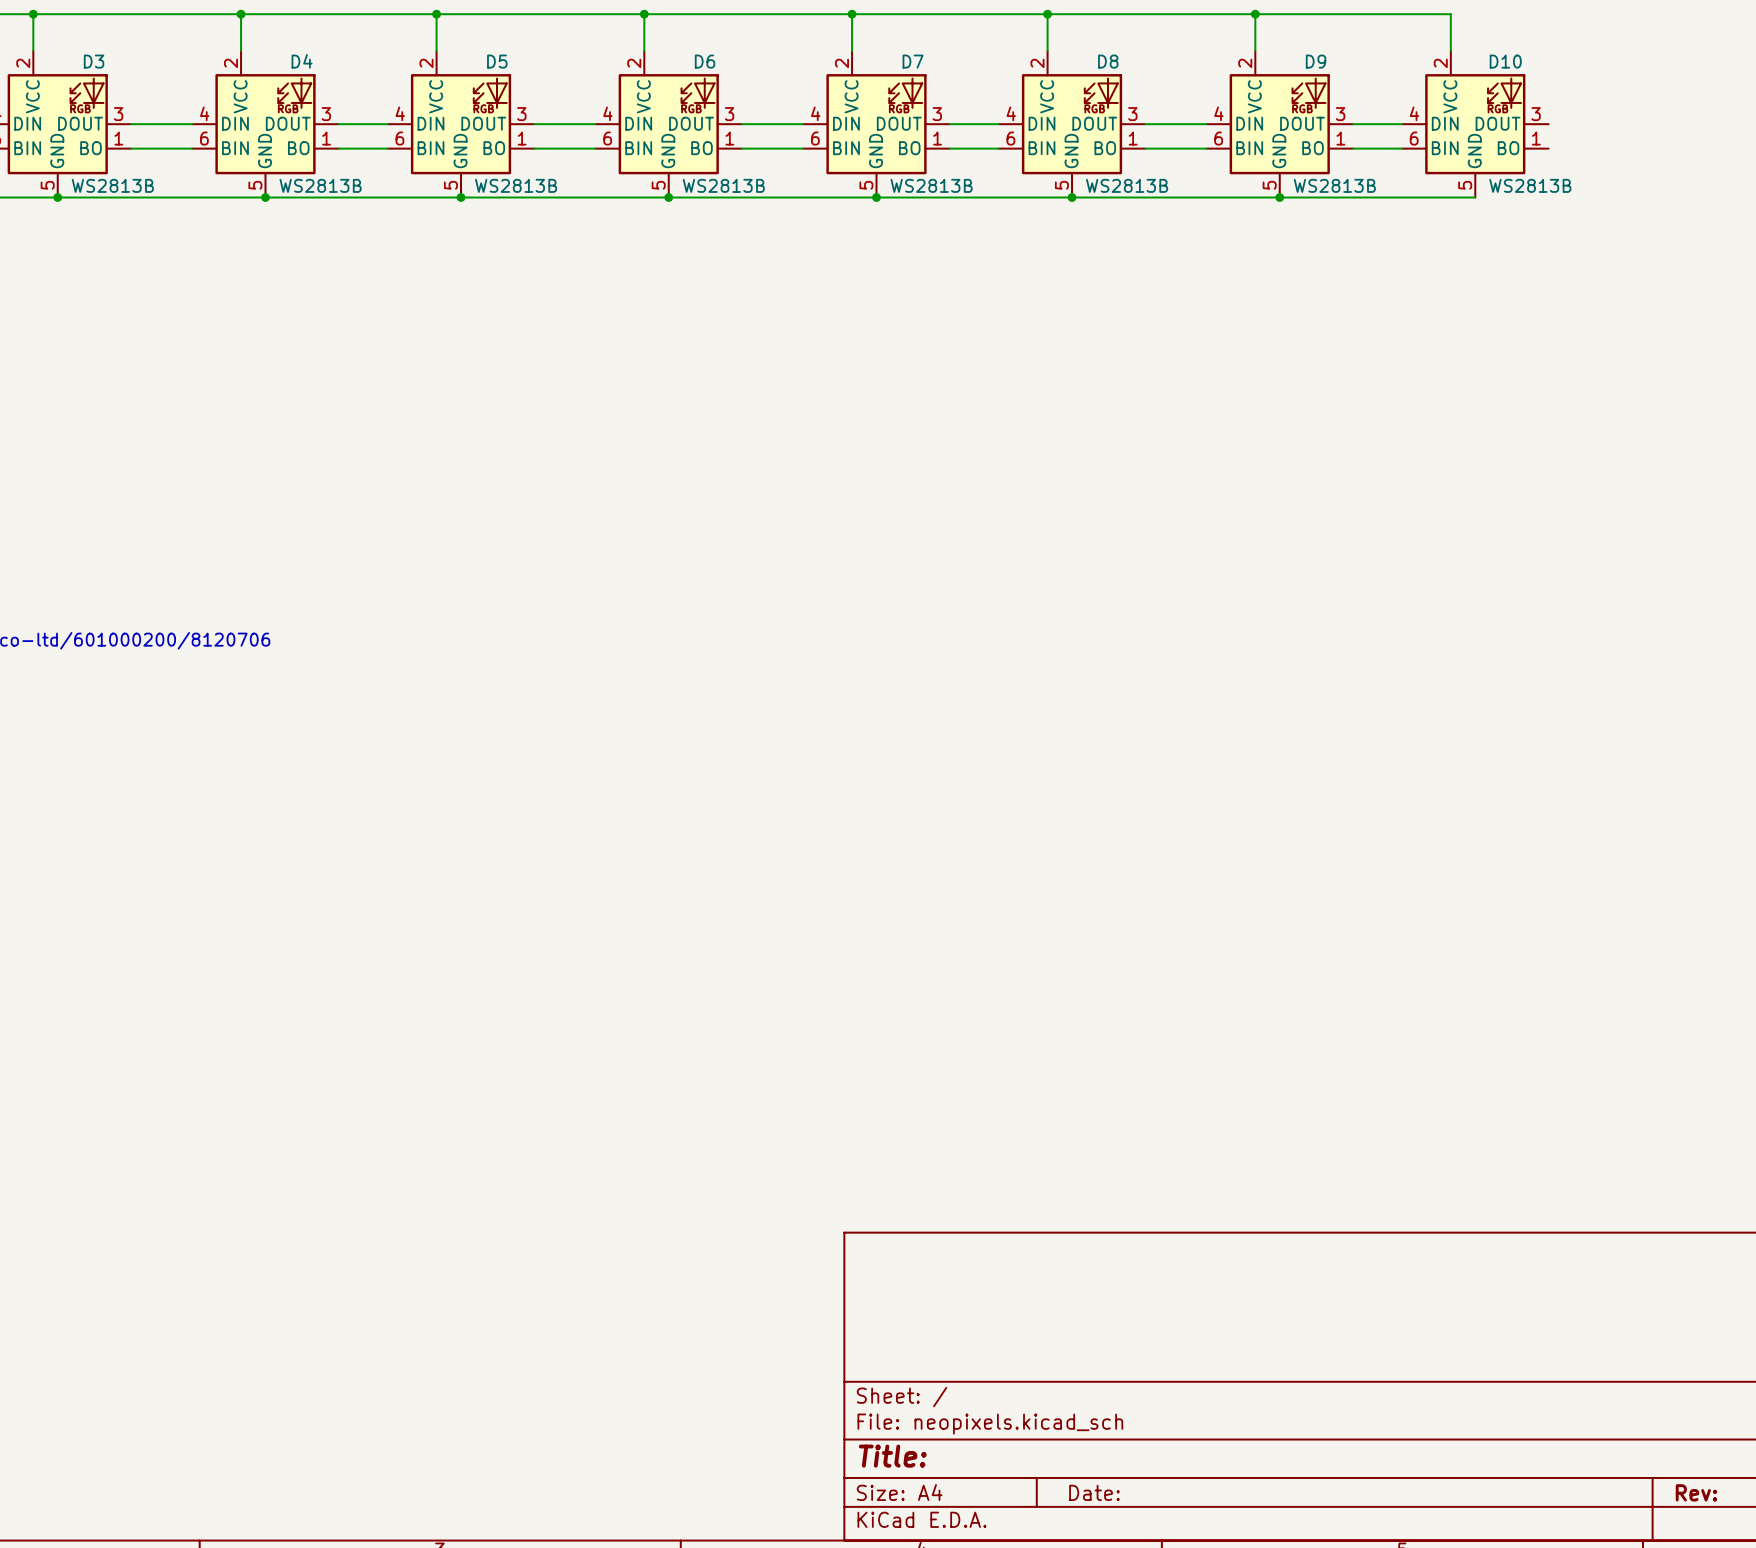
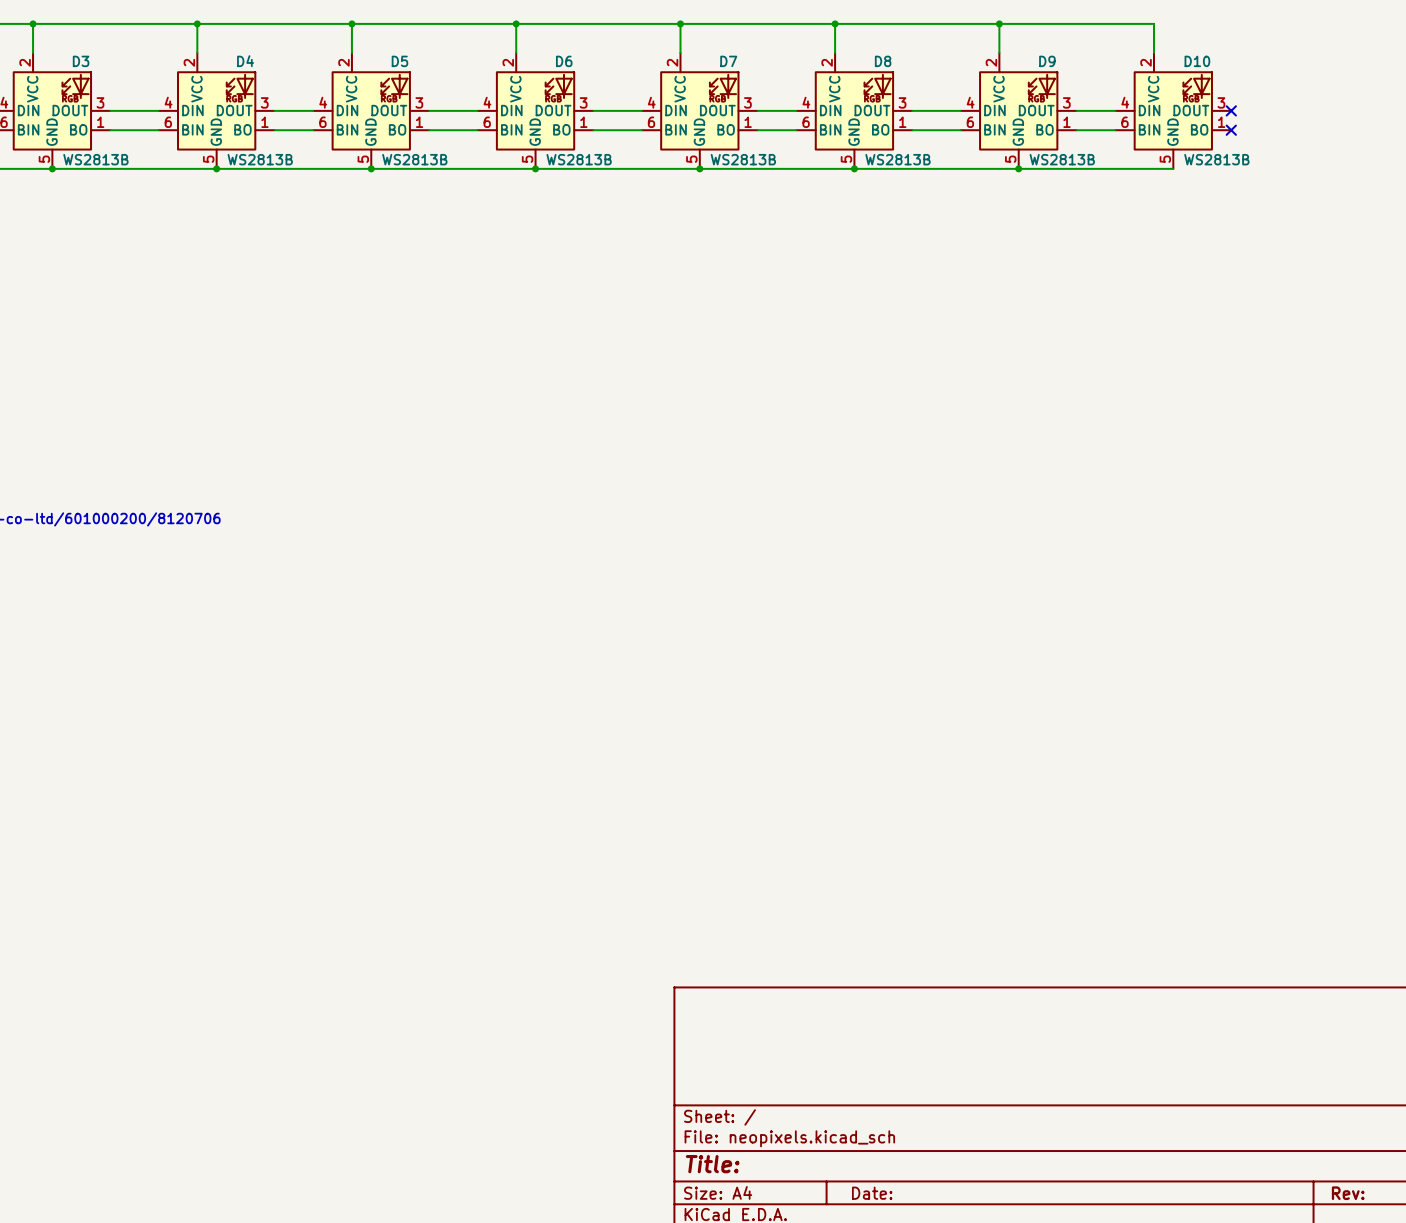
no-connect mark: none -> (1231, 110)
no-connect mark: none -> (1231, 130)

